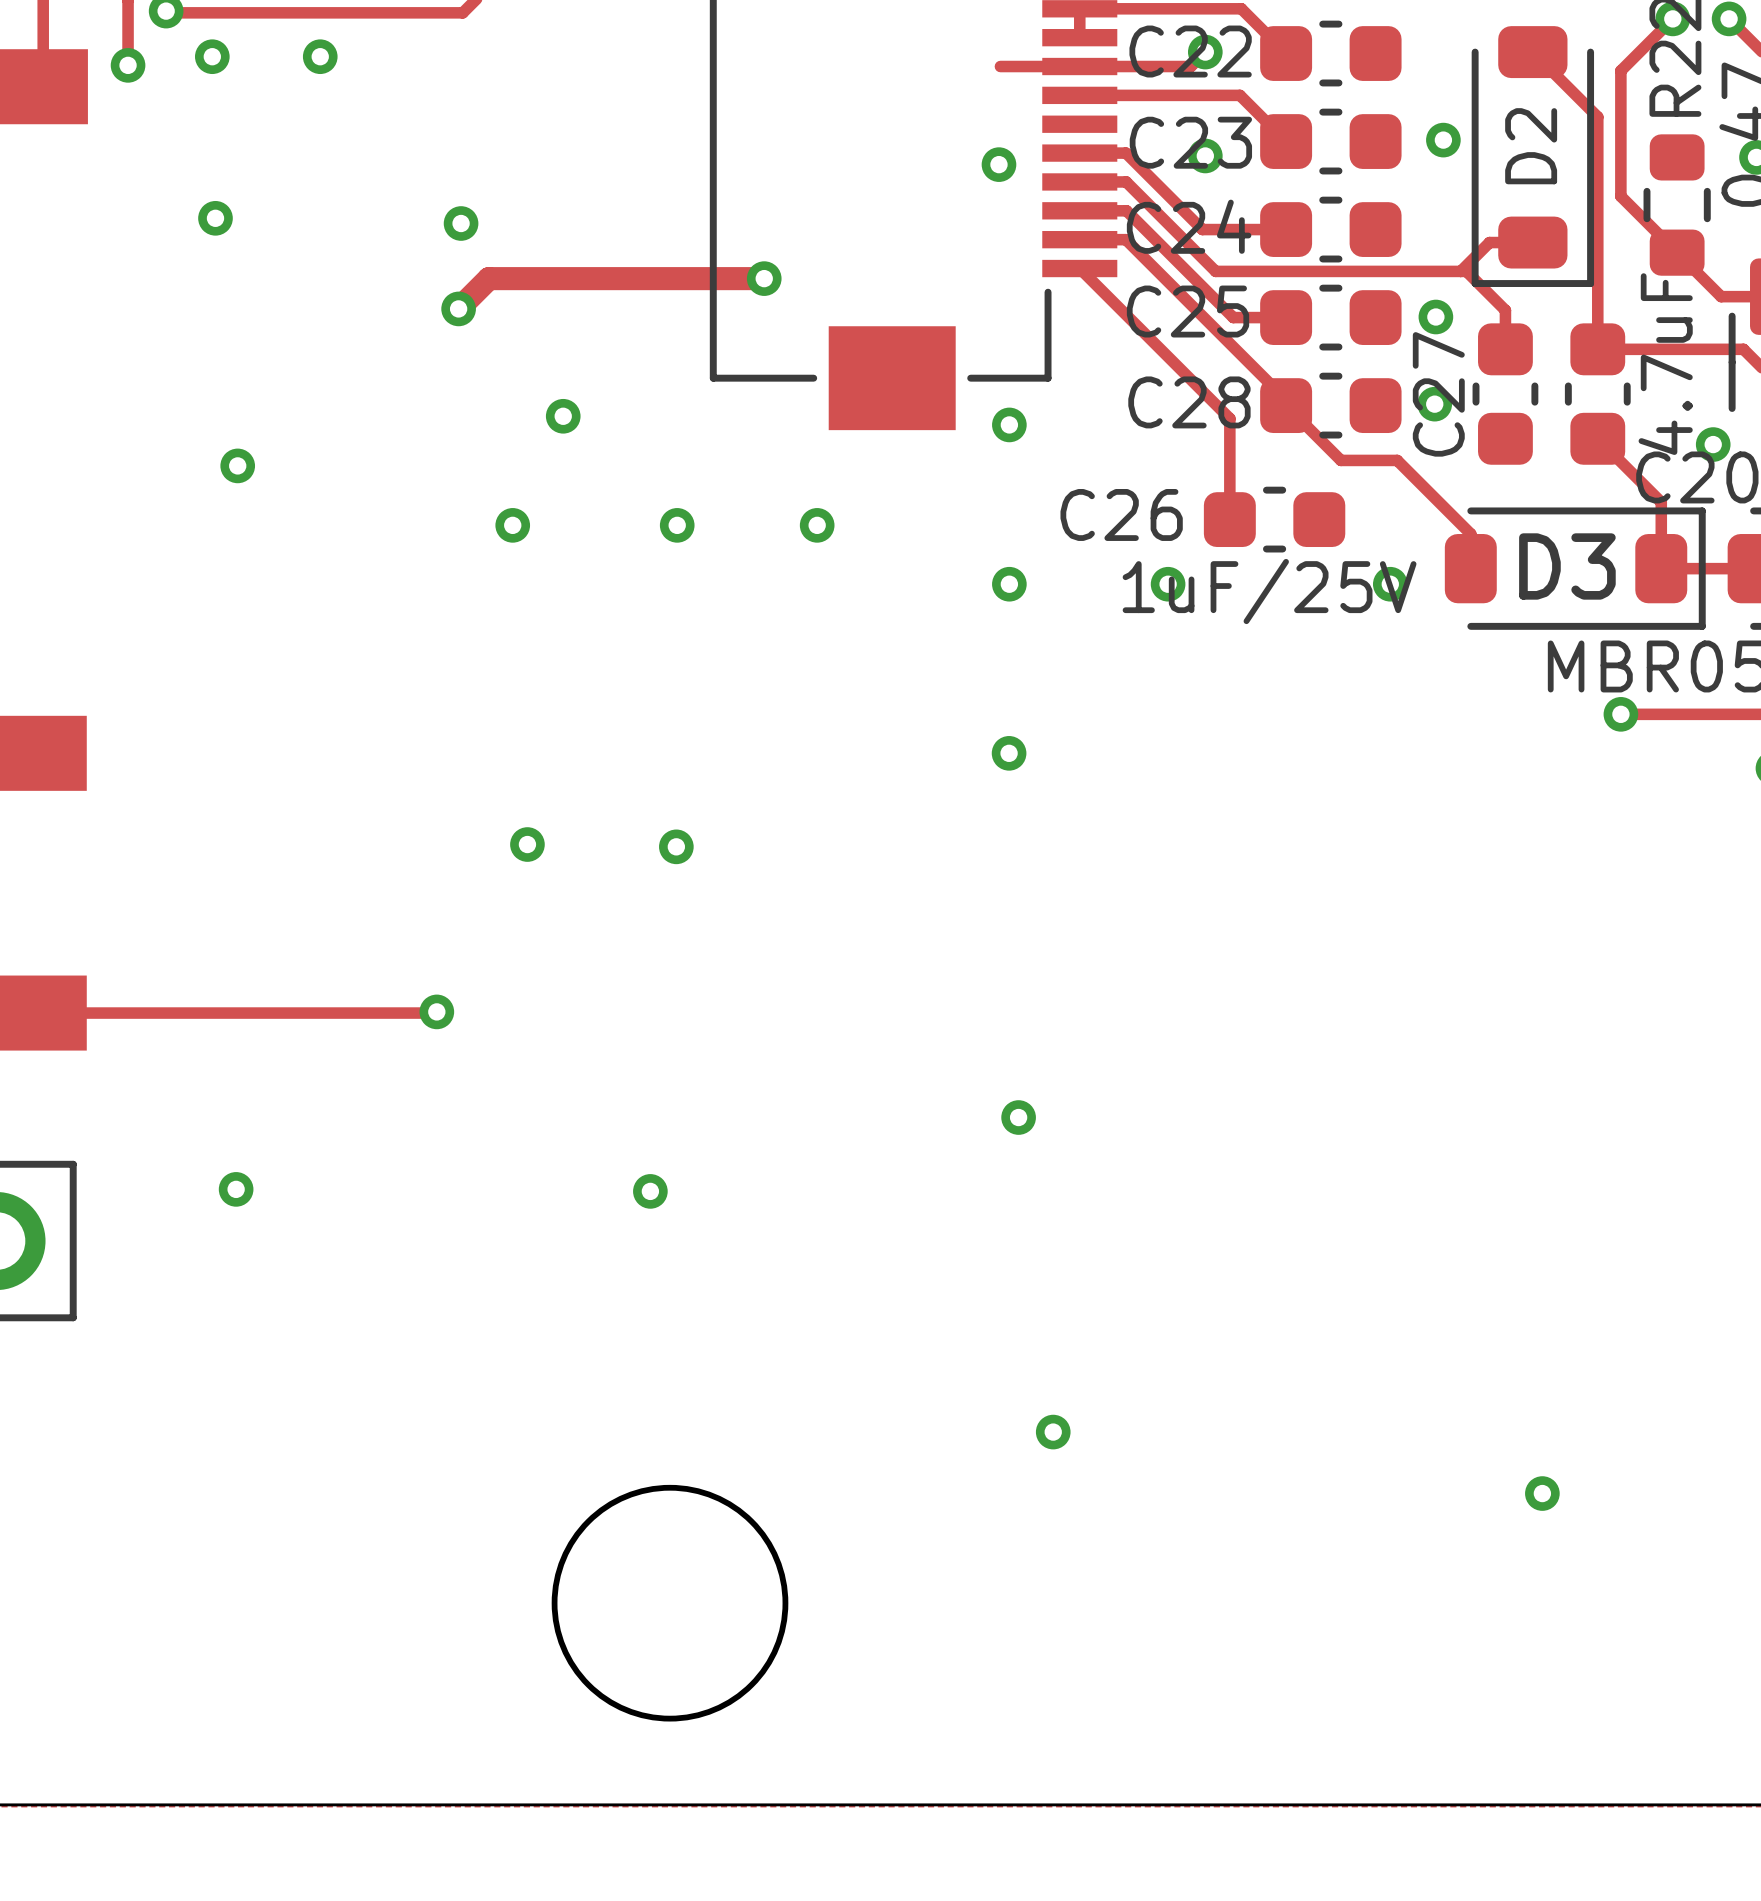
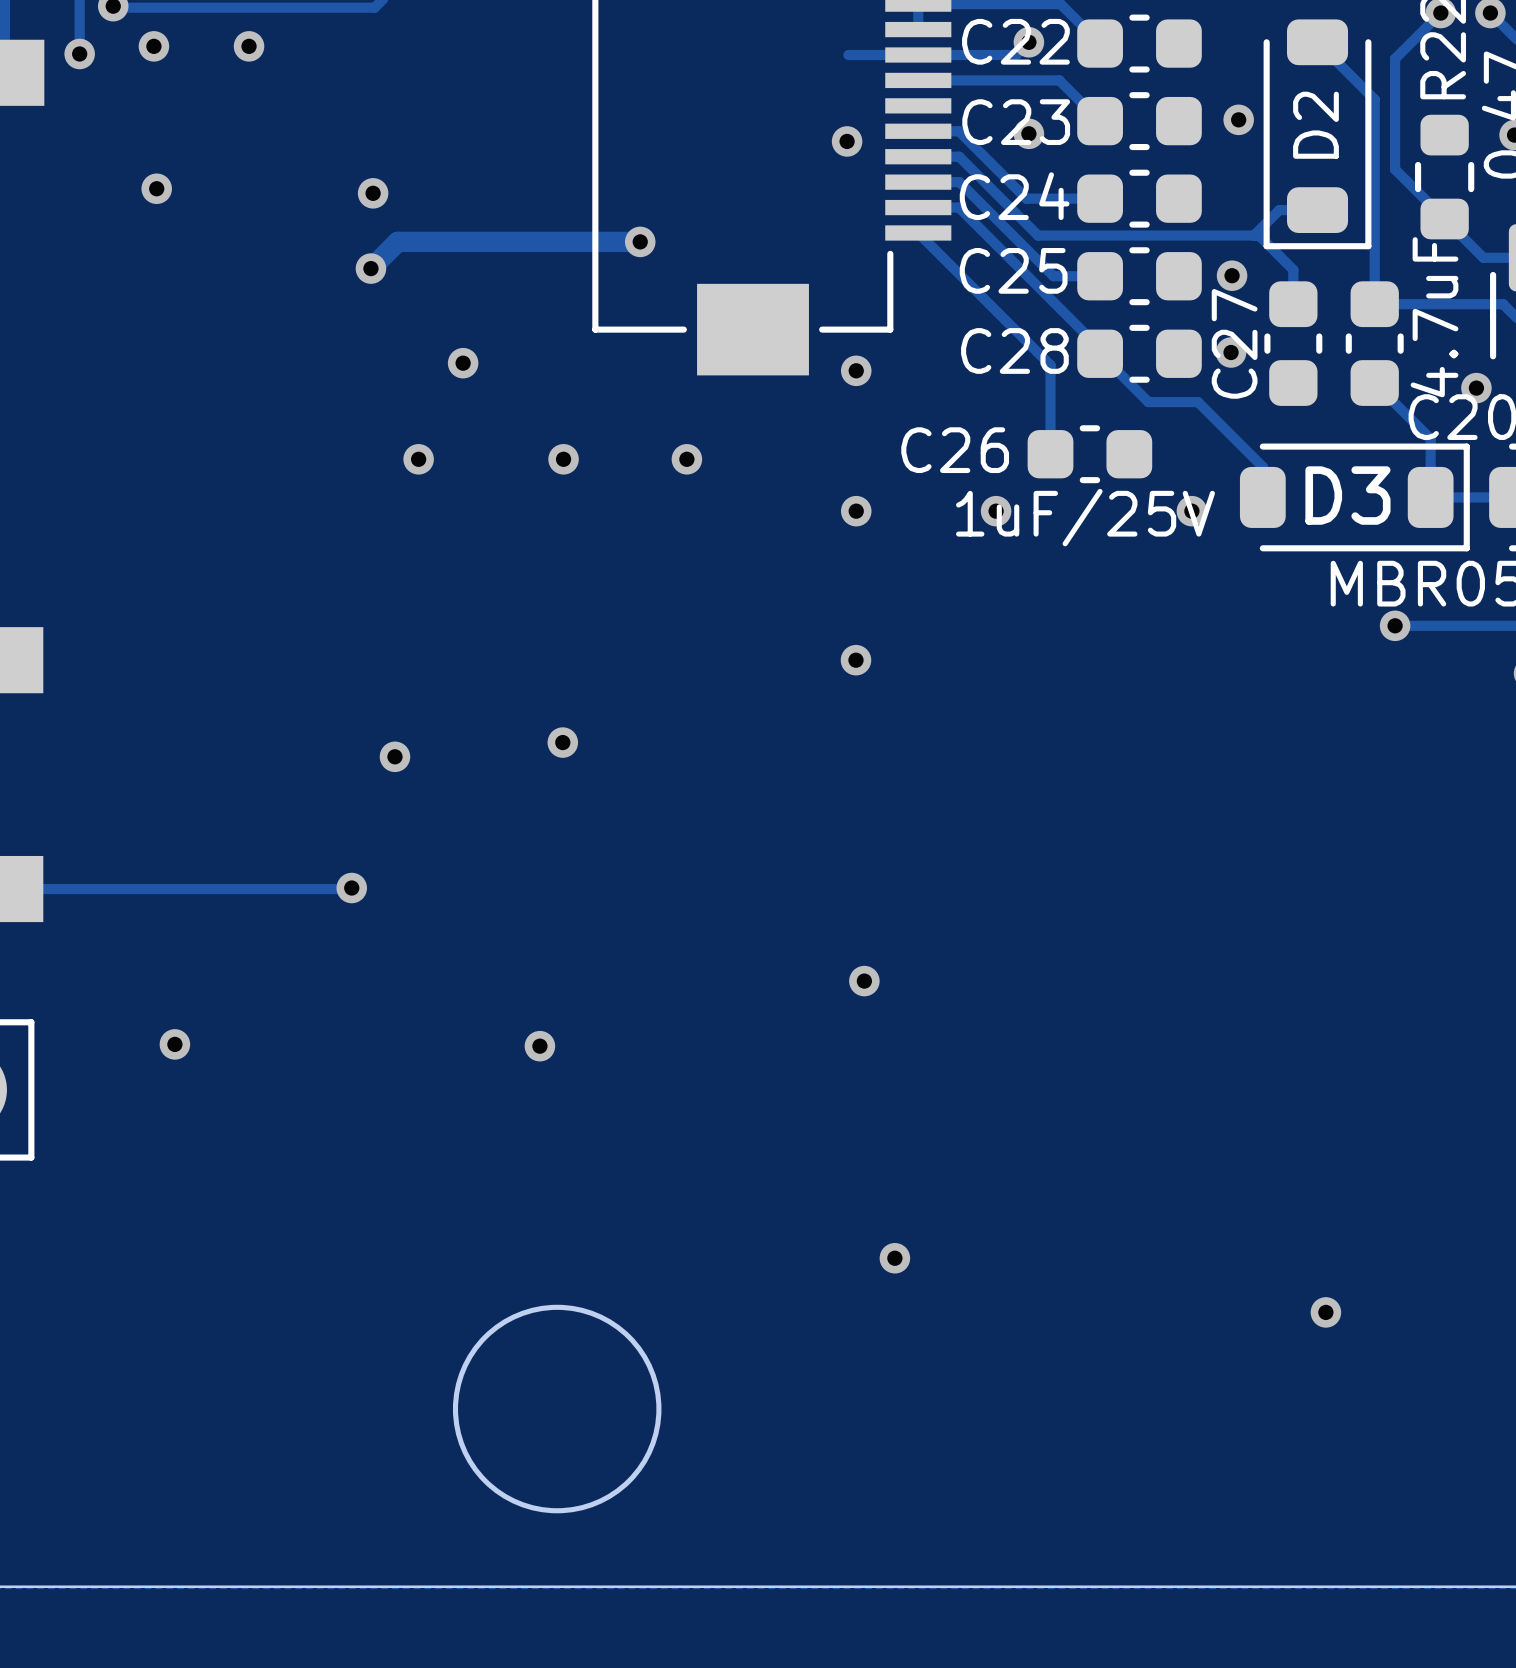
via: (237, 465) -> none
via position: (527, 844) -> (394, 756)

